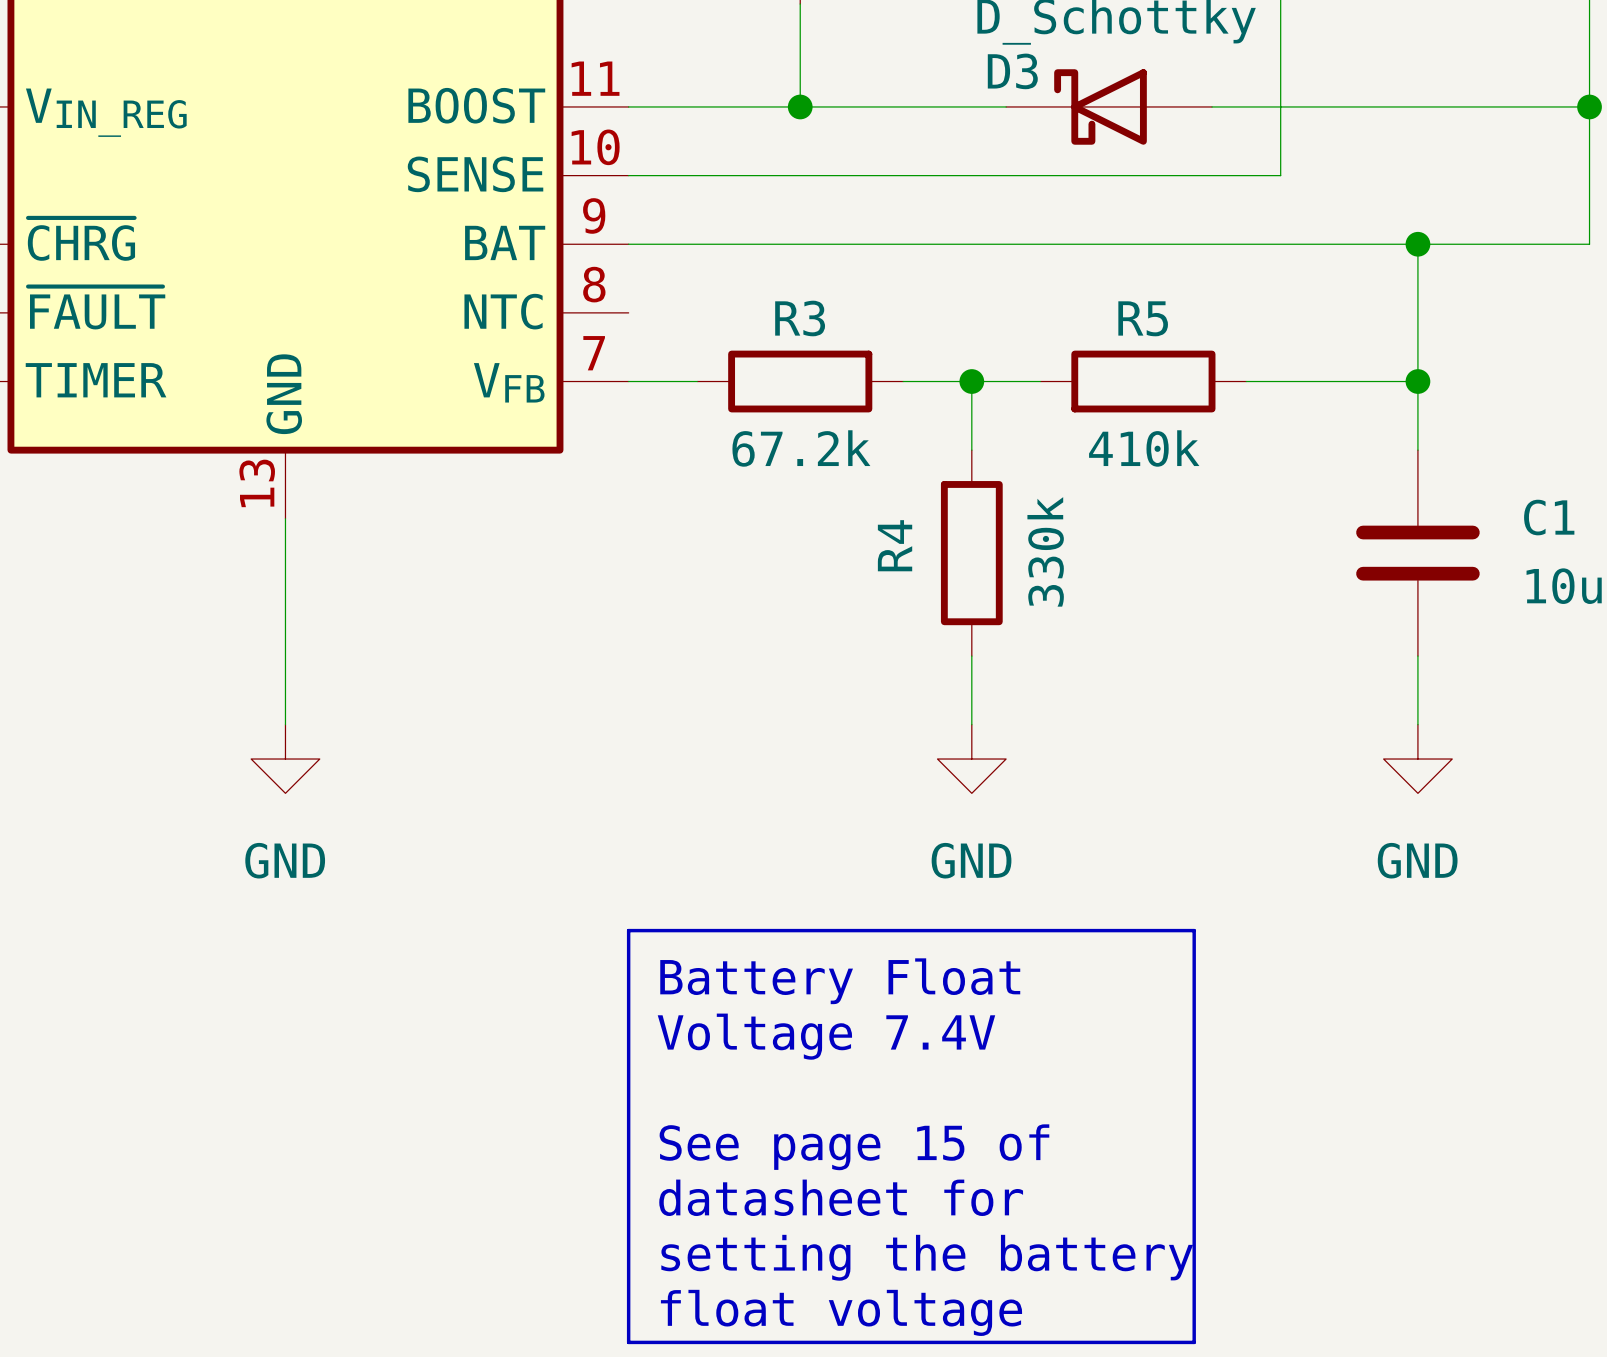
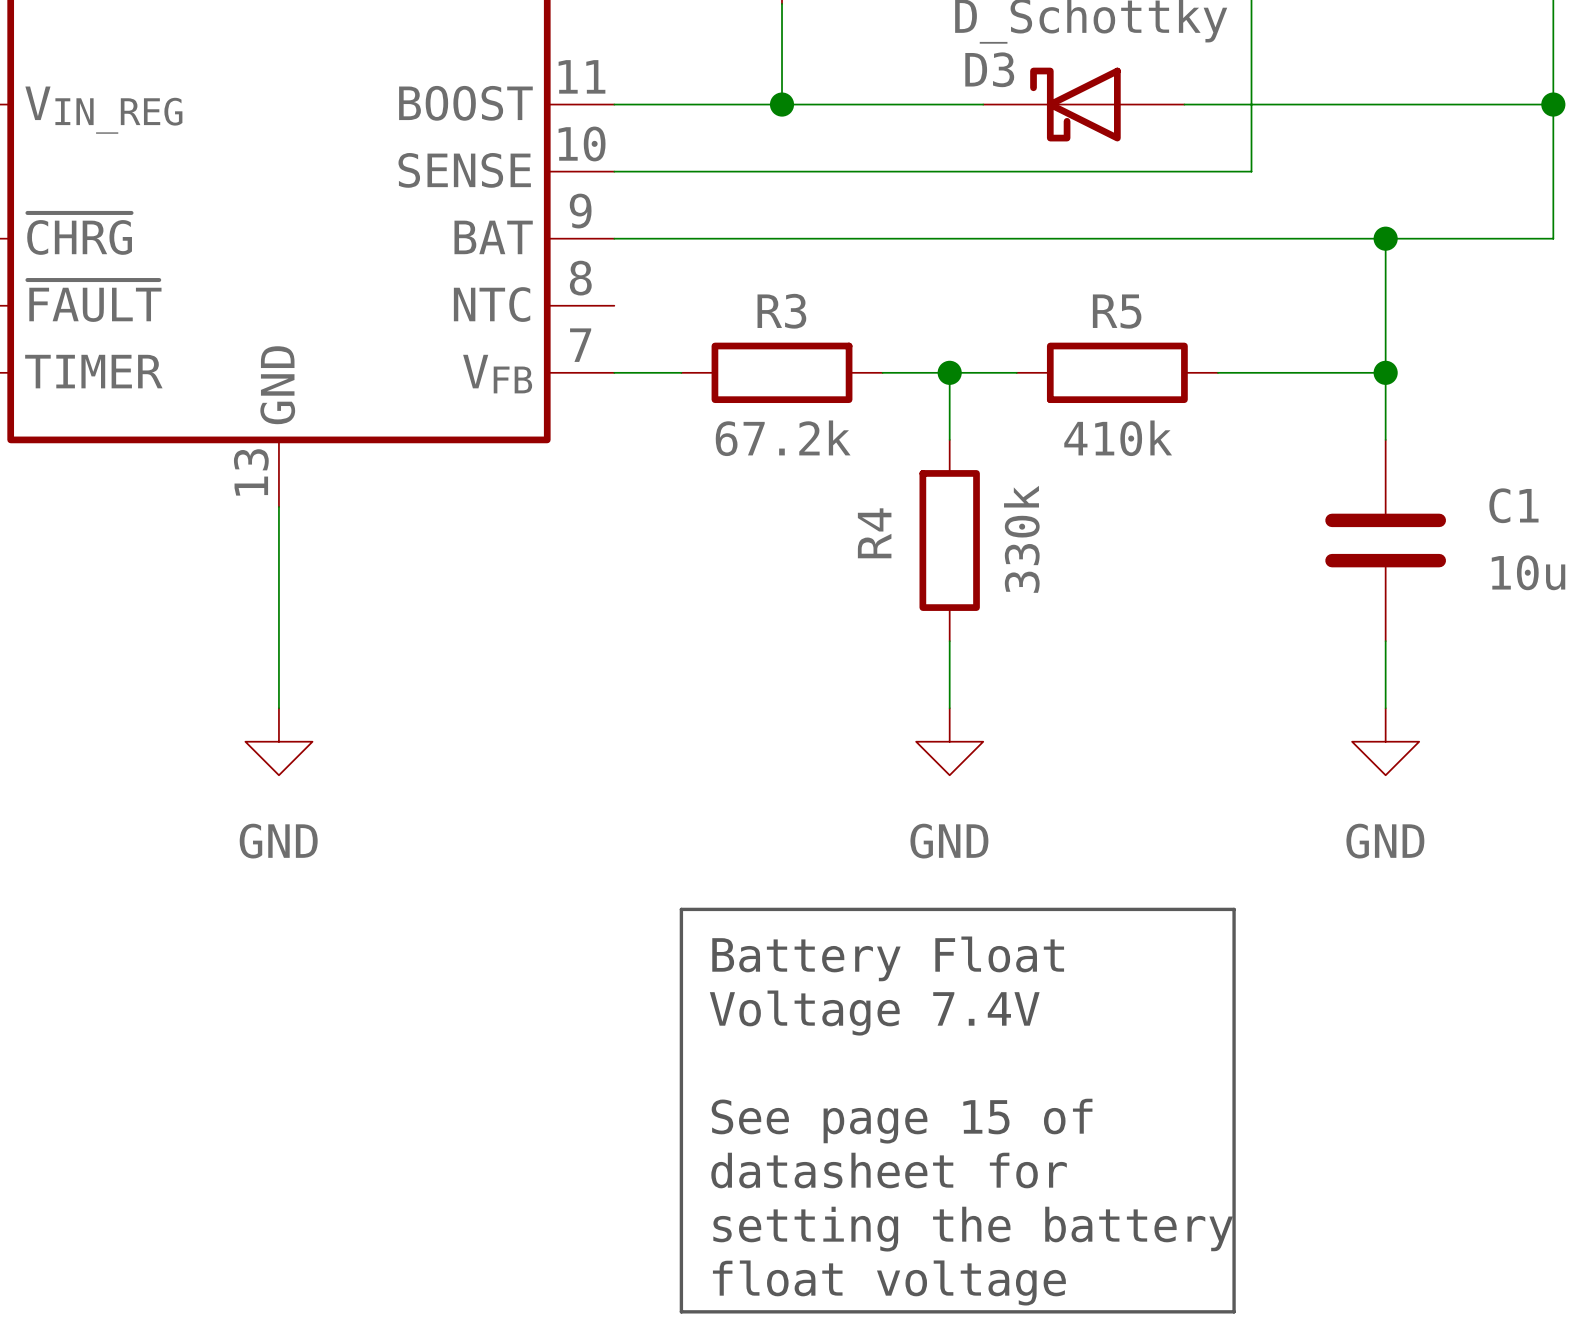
line: (697, 930) (628, 930) (628, 1342) (697, 1342) -> (681, 909) (681, 1311)
line: (1194, 930) (1194, 1342) -> (1166, 909) (1234, 909) (1234, 1311) (1166, 1311)
text position: Battery Float (840, 981) -> Battery Float (888, 958)
text position: Voltage 7.4V (826, 1036) -> Voltage 7.4V (874, 1013)
text position: See page 15 of (854, 1147) -> See page 15 of (902, 1121)
text position: datasheet for (841, 1197) -> datasheet for (889, 1170)
text position: setting the battery (927, 1257) -> setting the battery (973, 1229)
text position: float voltage (841, 1312) -> float voltage (889, 1283)

